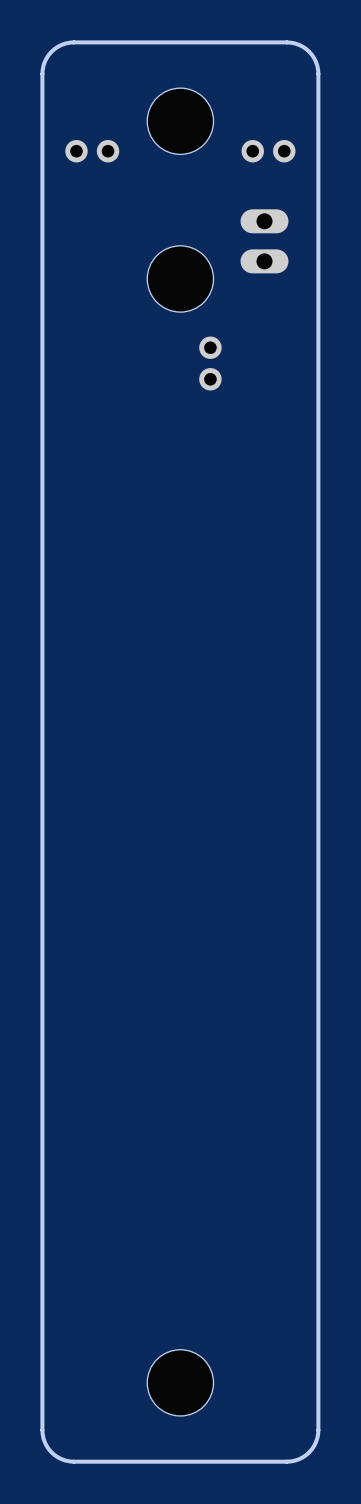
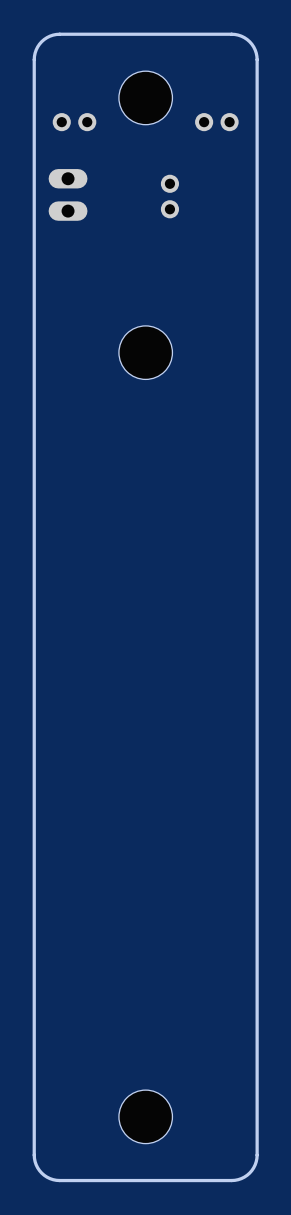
part position: (264, 241) -> (68, 194)
hole position: (180, 278) -> (145, 352)
part position: (210, 363) -> (169, 196)

